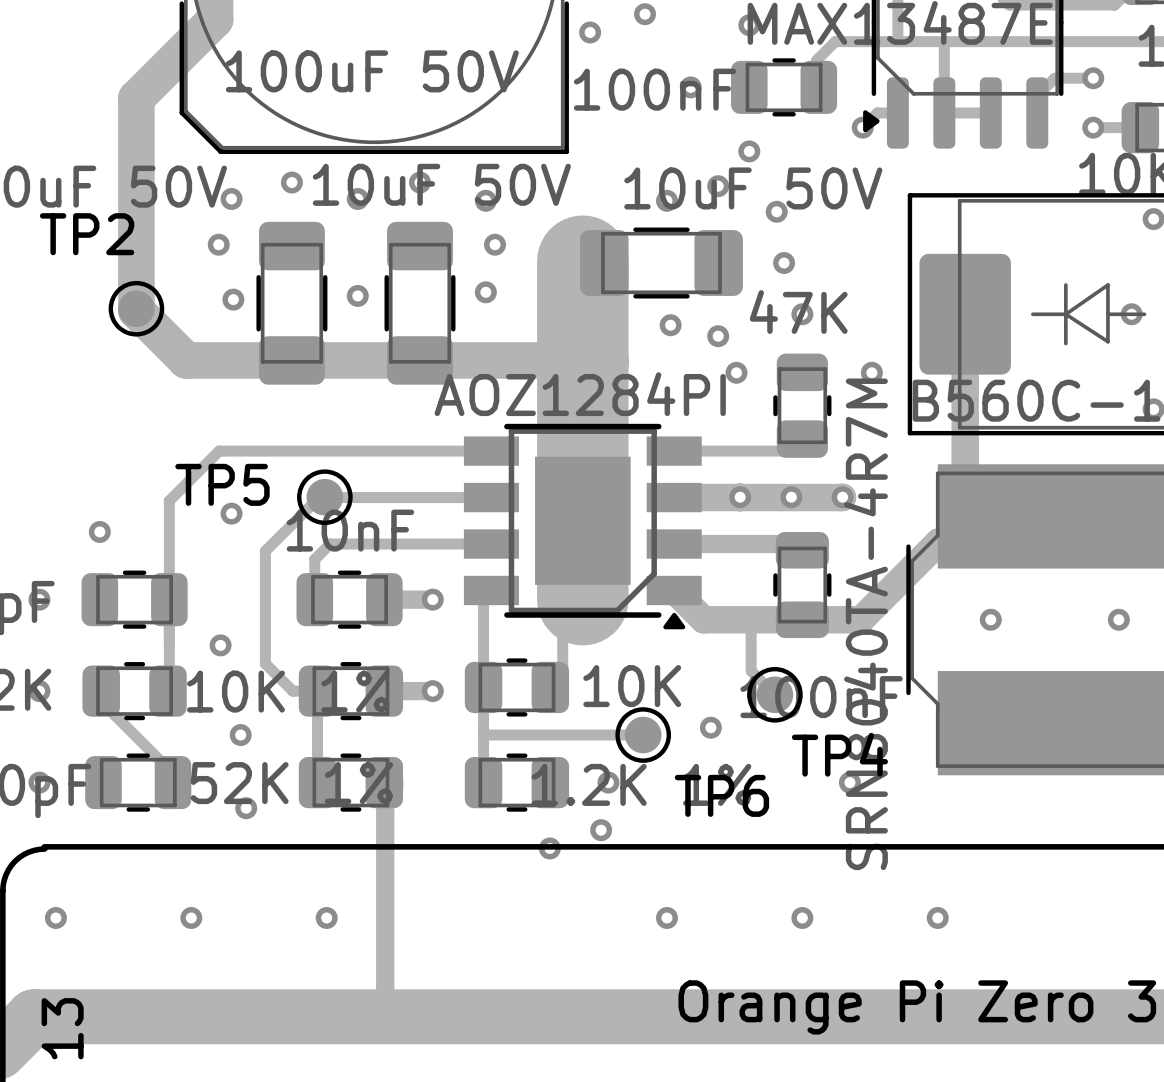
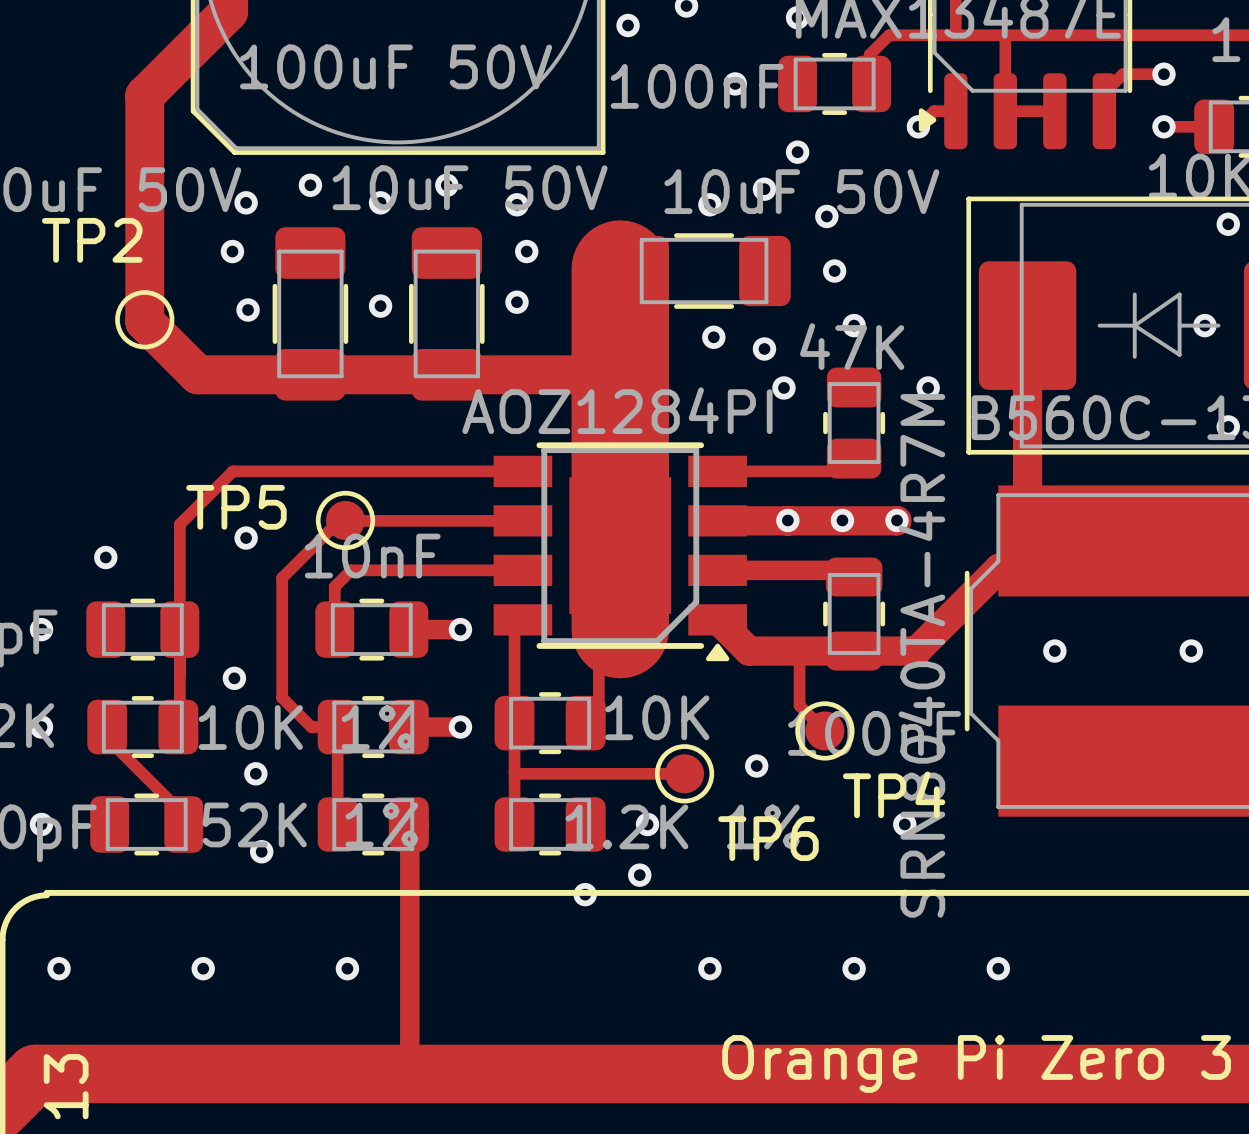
part value position: 47K (798, 312) -> 47K (852, 346)
part value position: 10K (632, 686) -> 10K (657, 717)

